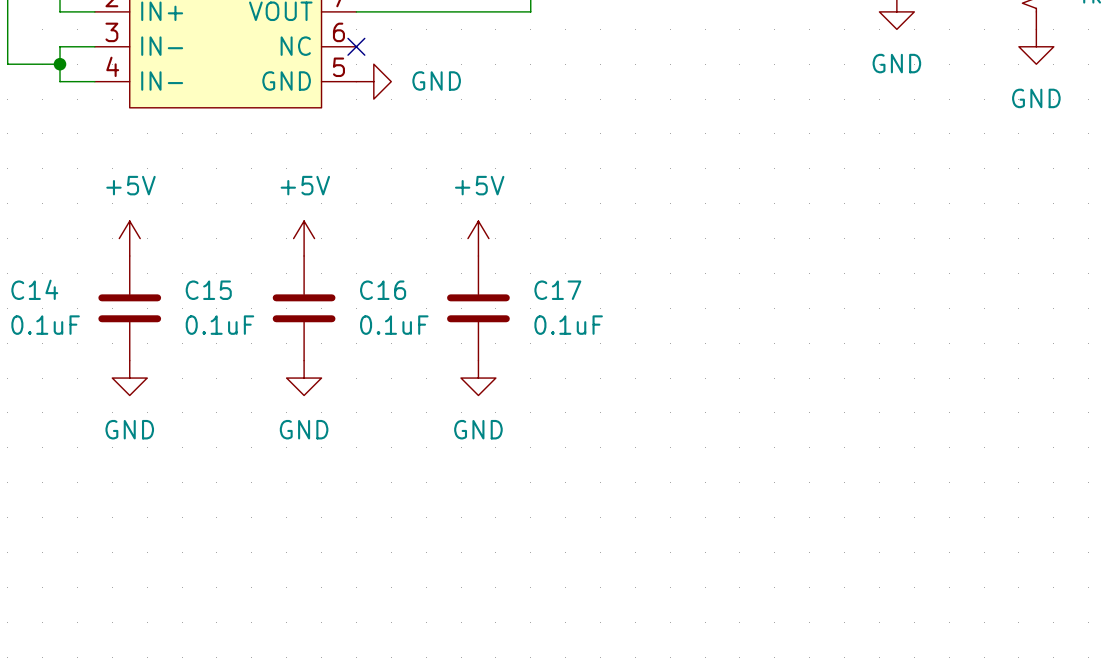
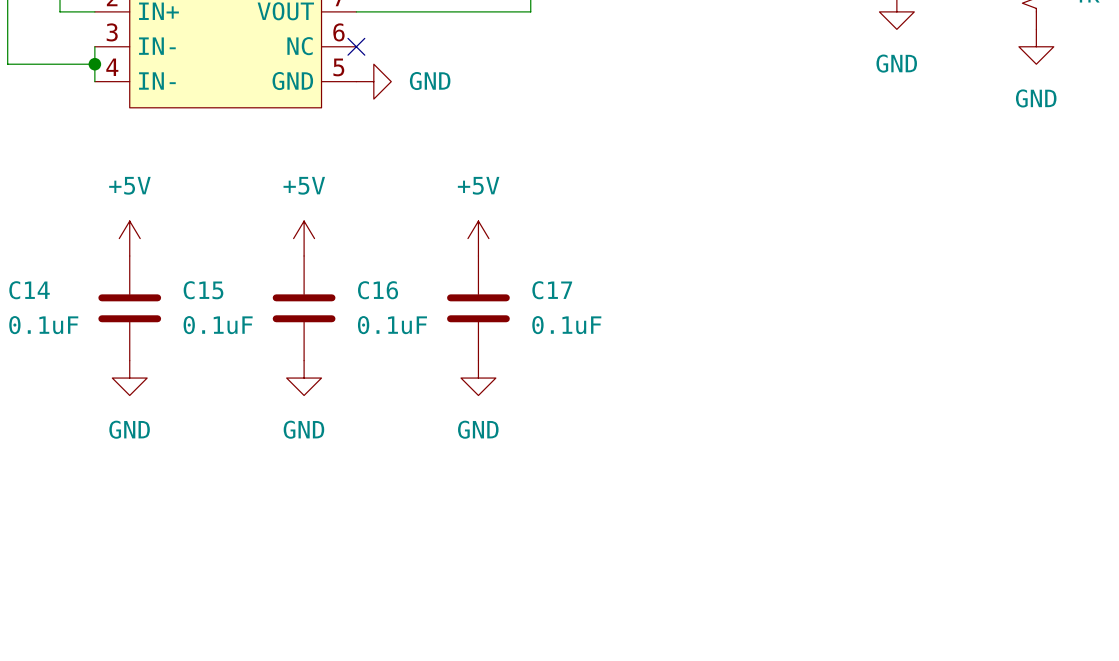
wire: (94, 46) (60, 46) (60, 81) (94, 81) -> (94, 46) (94, 81)
wire: none -> (60, 64) (94, 64)
junction position: (60, 64) -> (94, 64)

